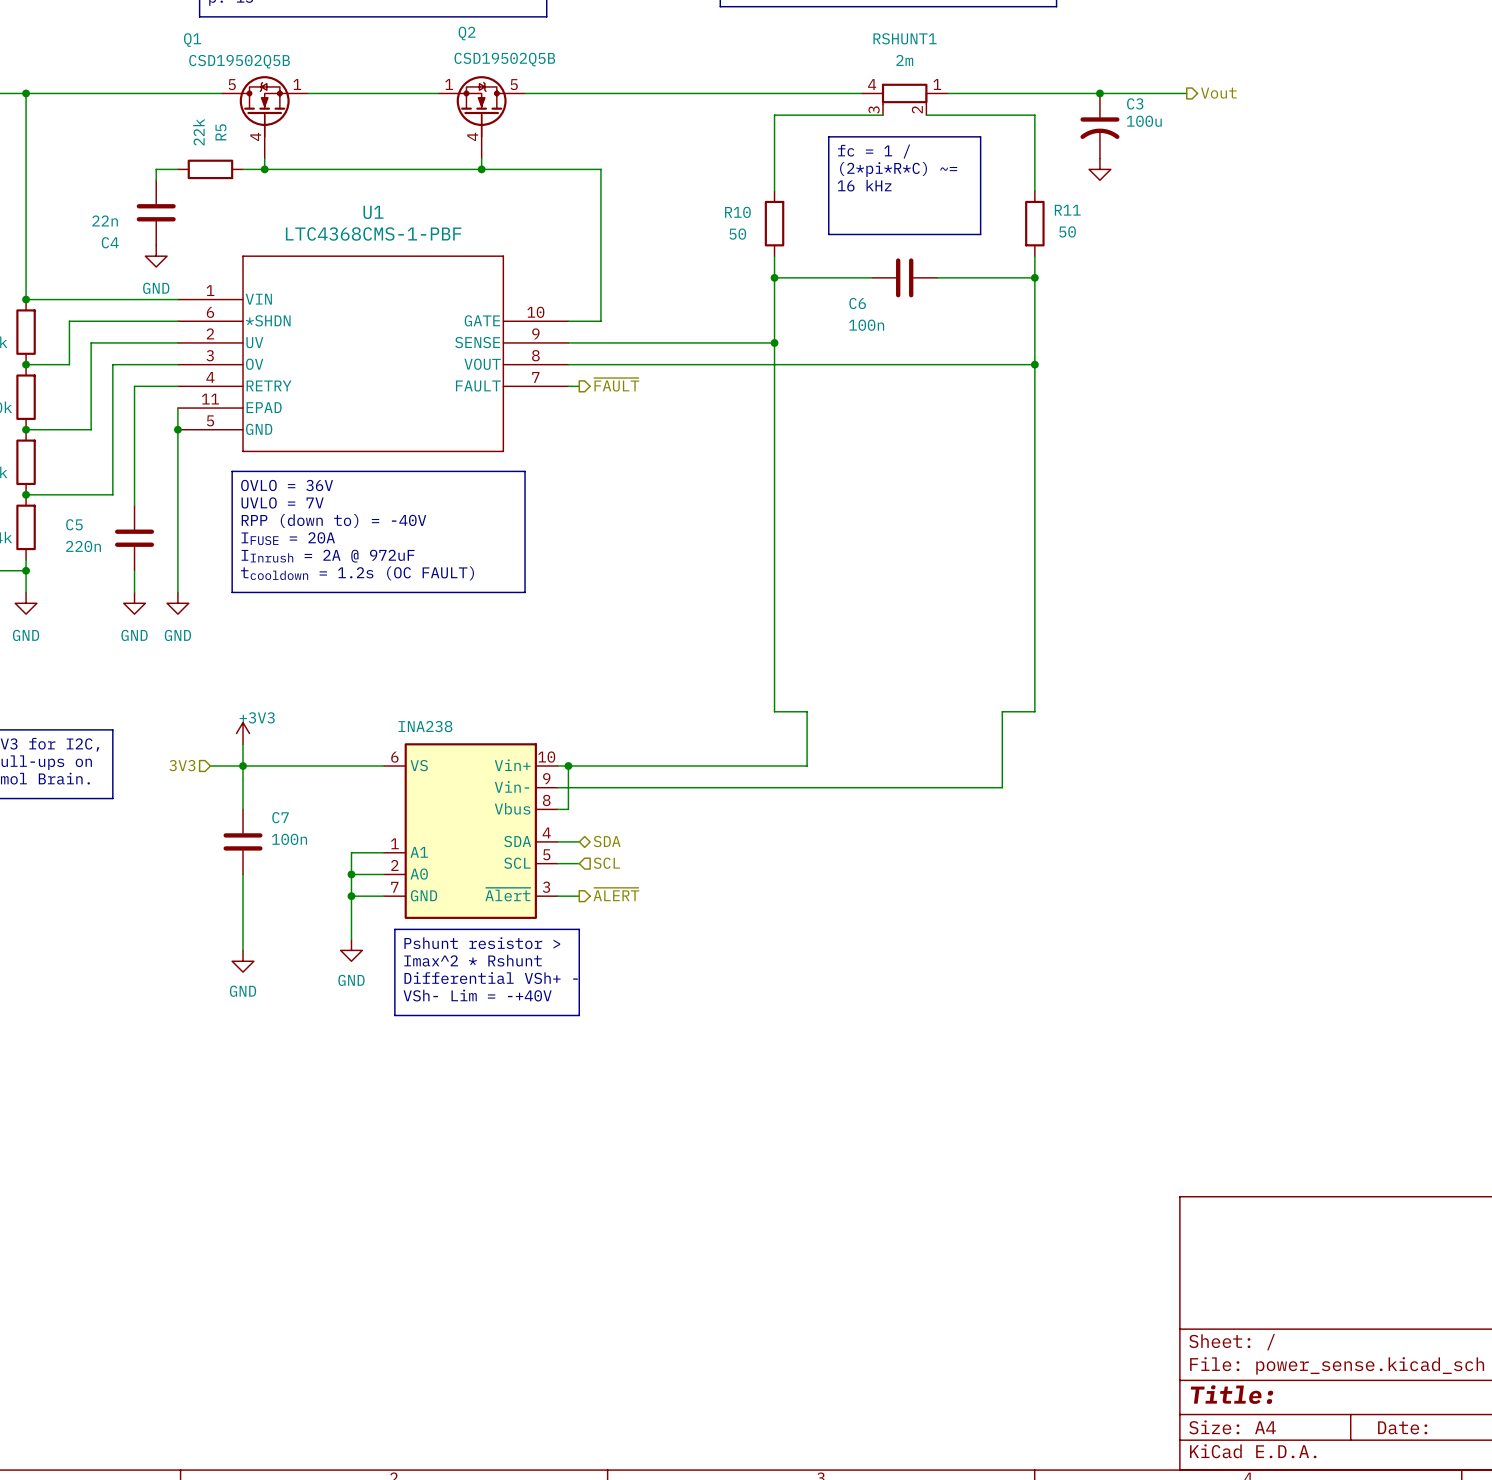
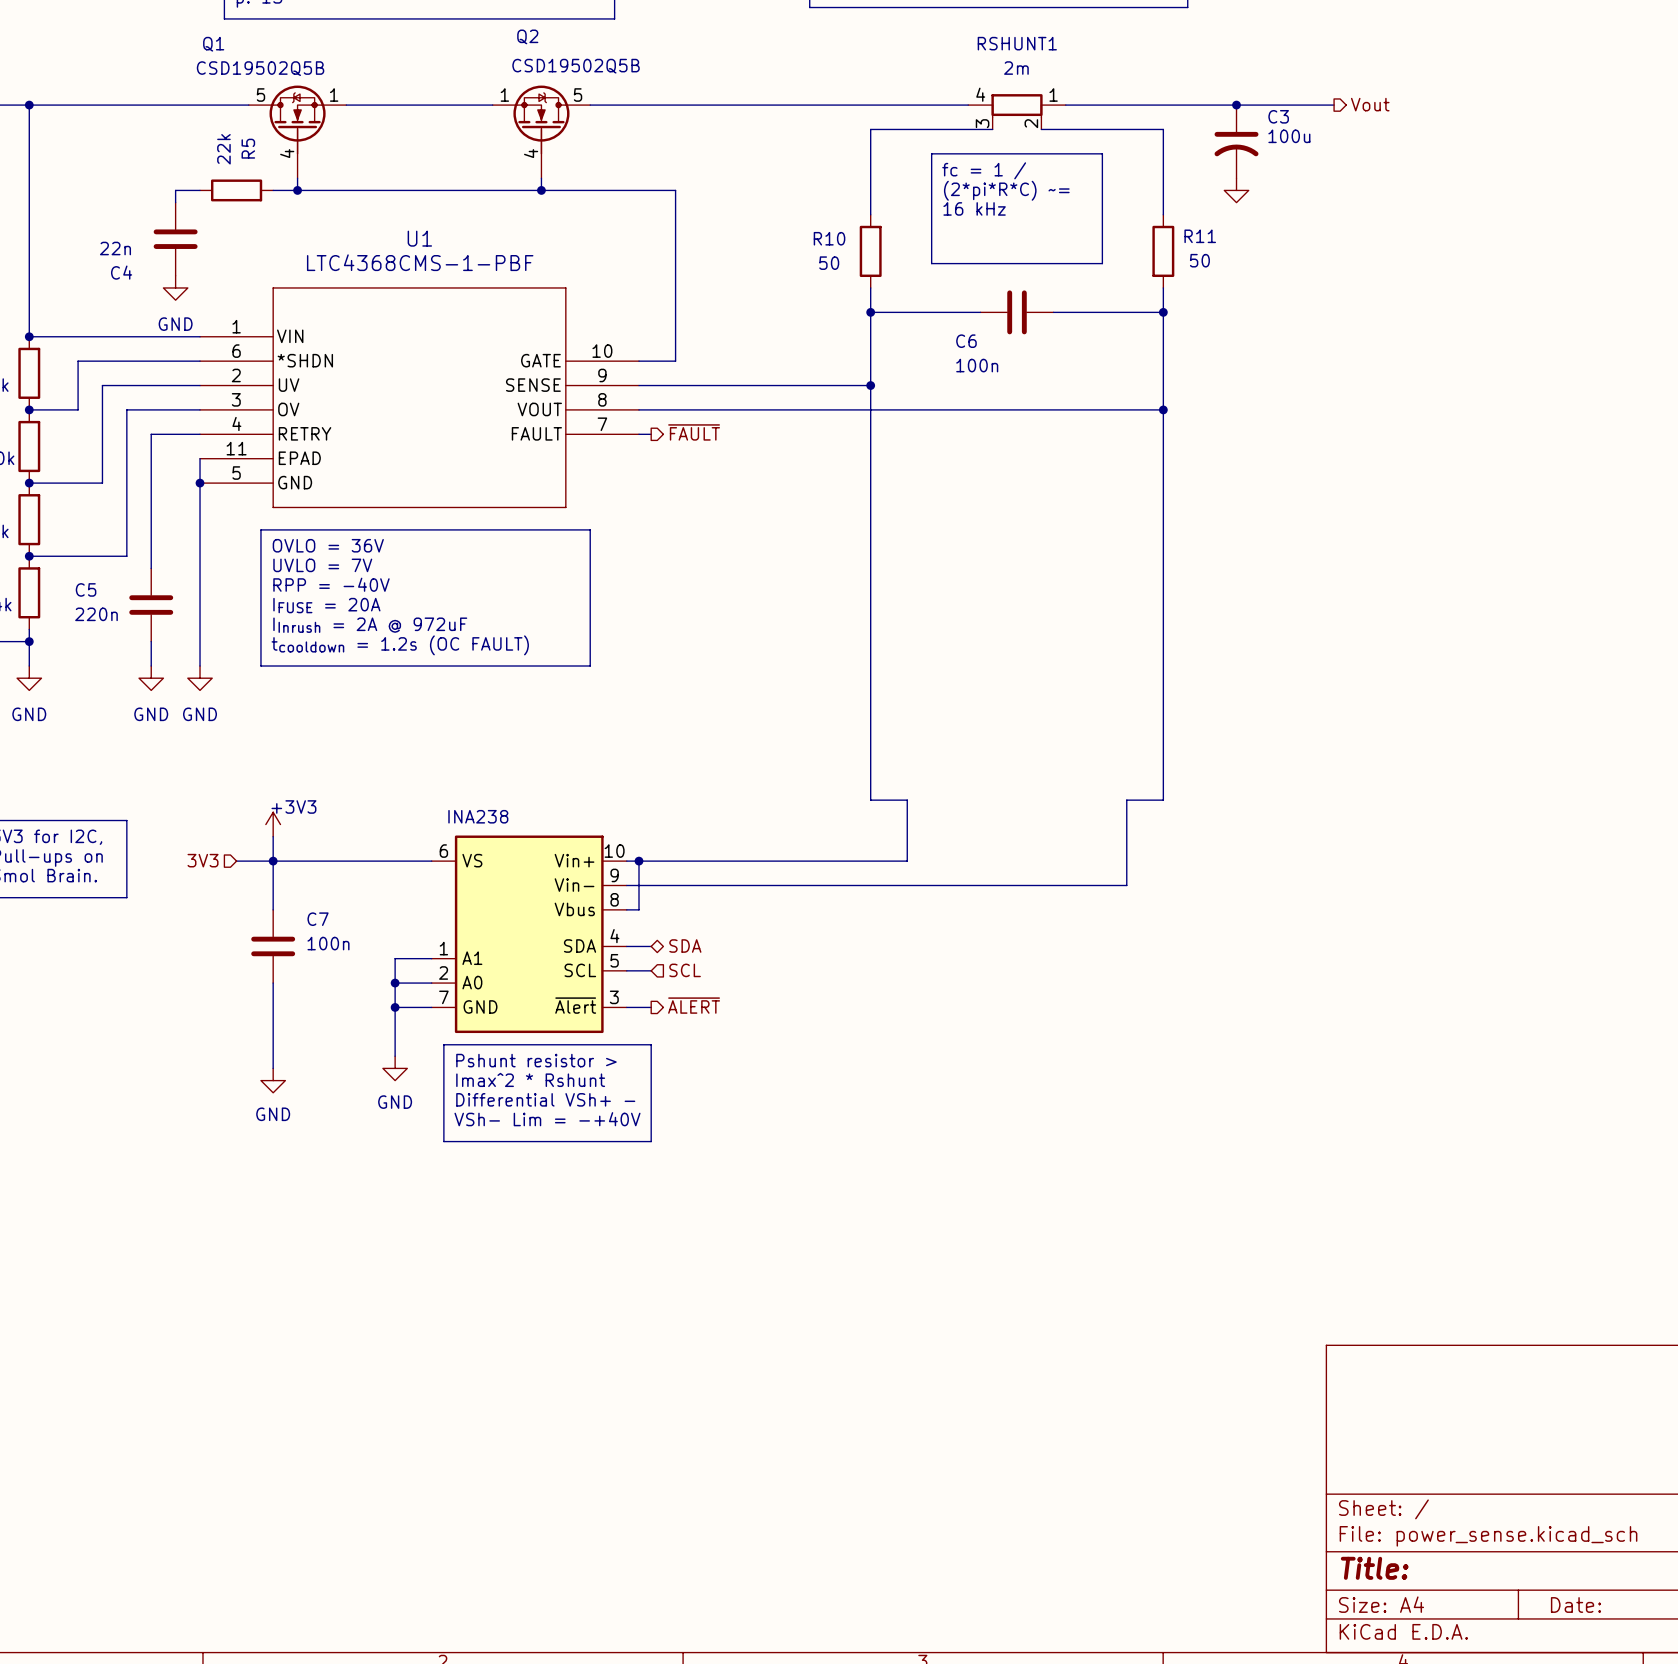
text: RPP (down to) = -40V (333, 521) -> RPP = -40V (331, 584)

